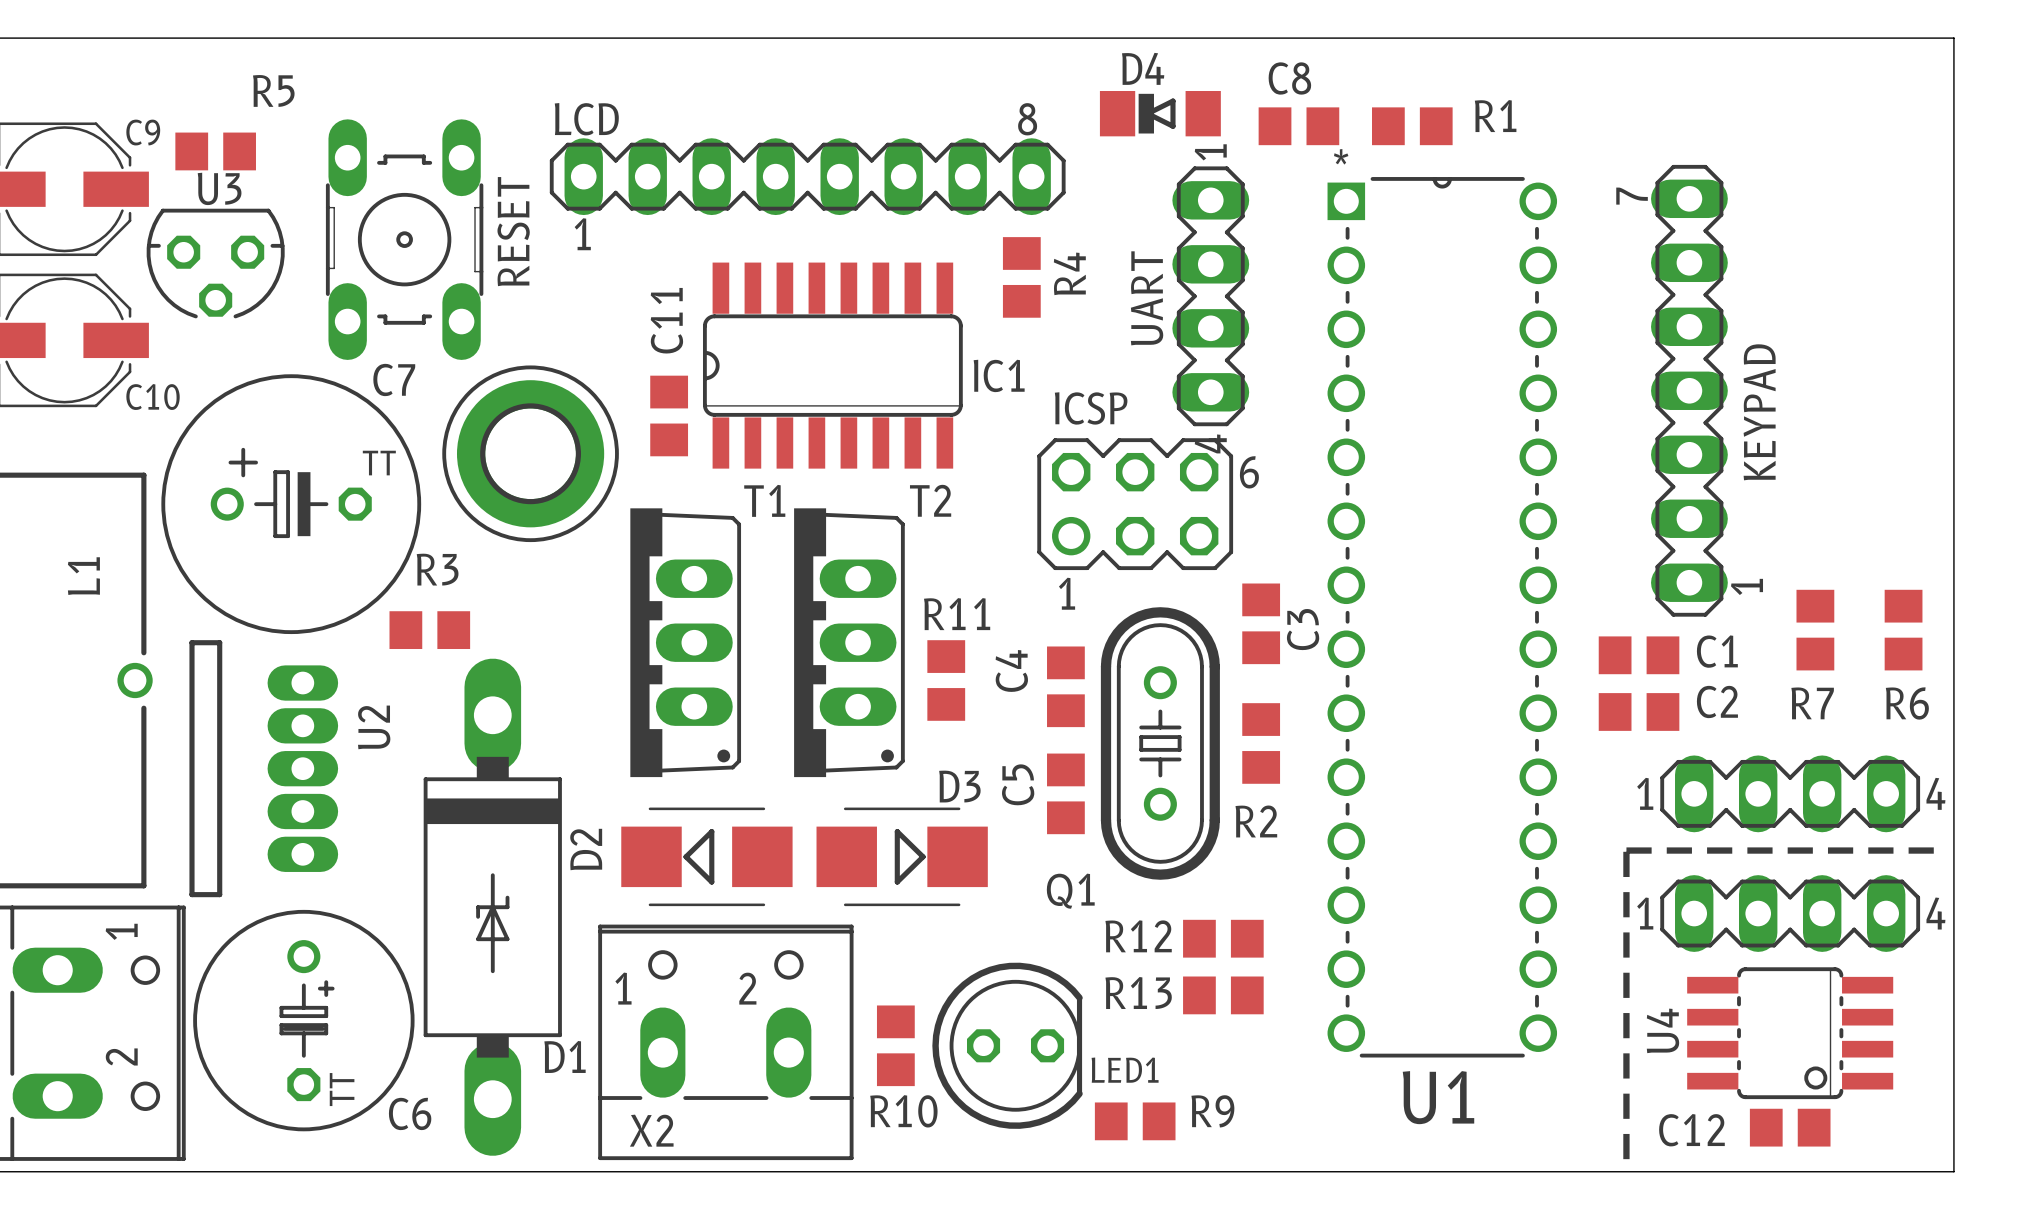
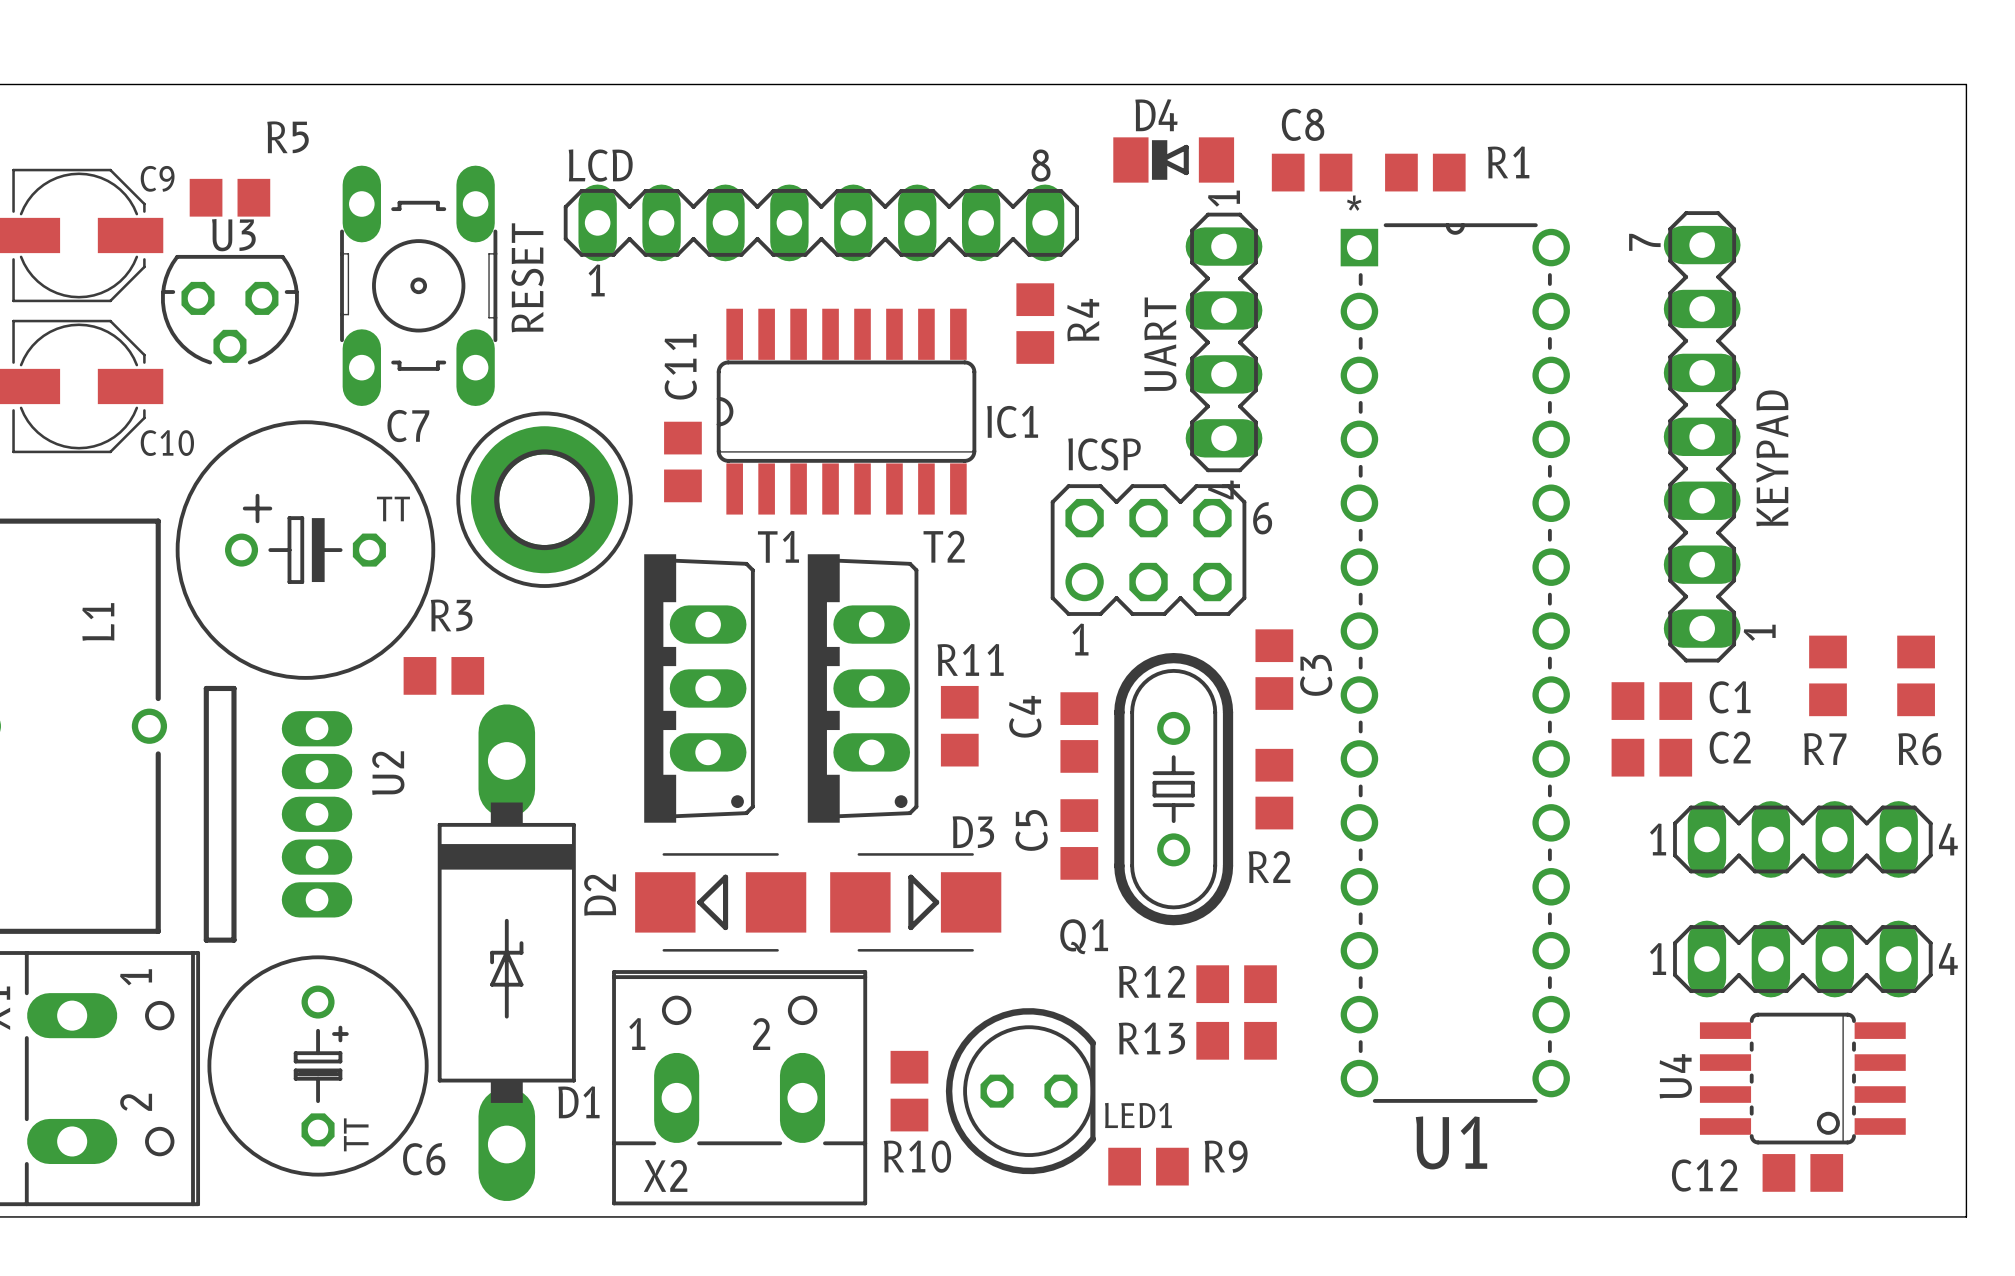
line: (1941, 850) (1626, 850) (1626, 1159) -> none

